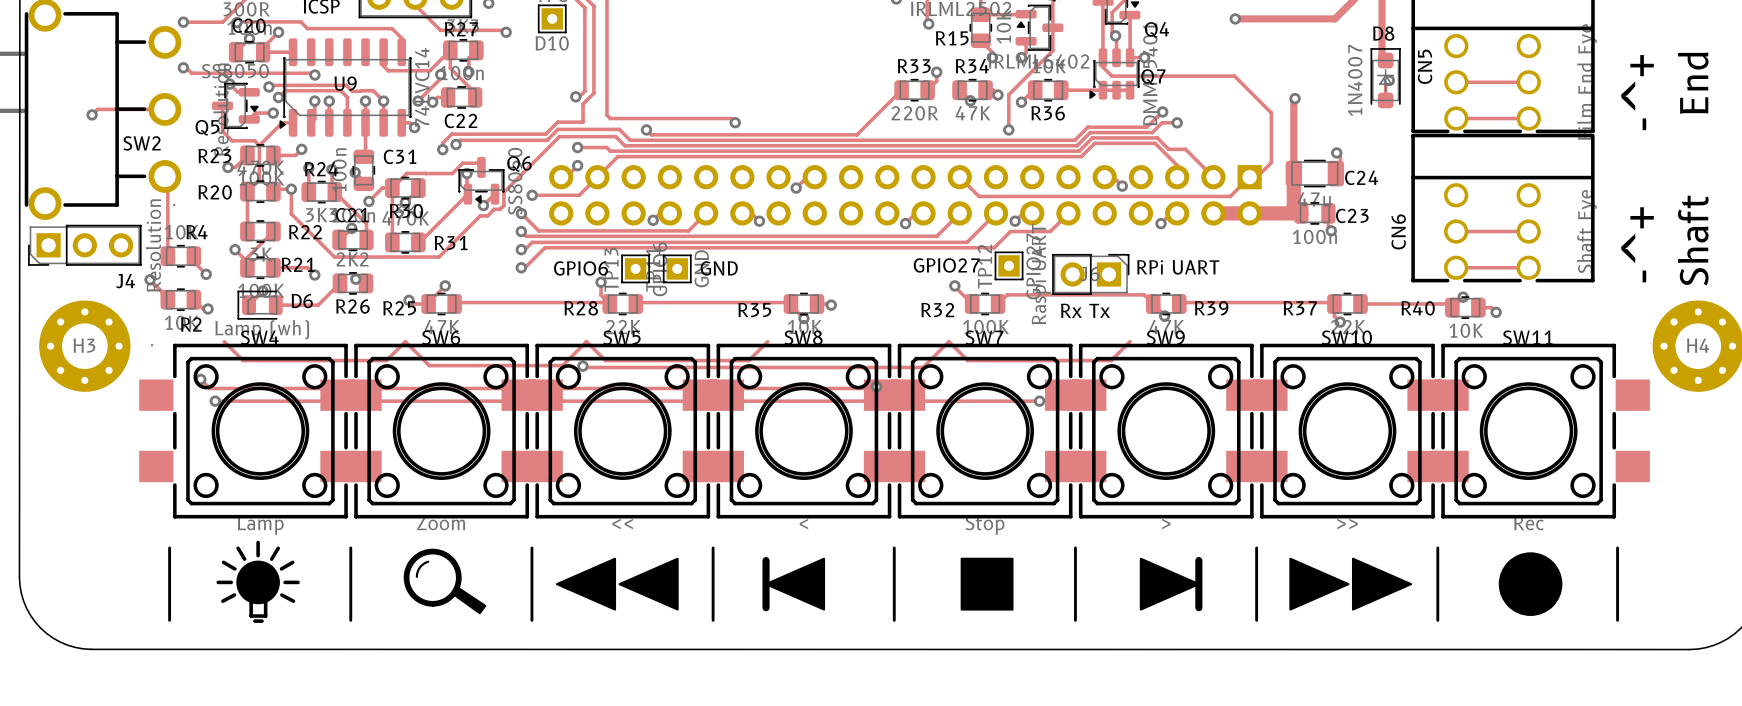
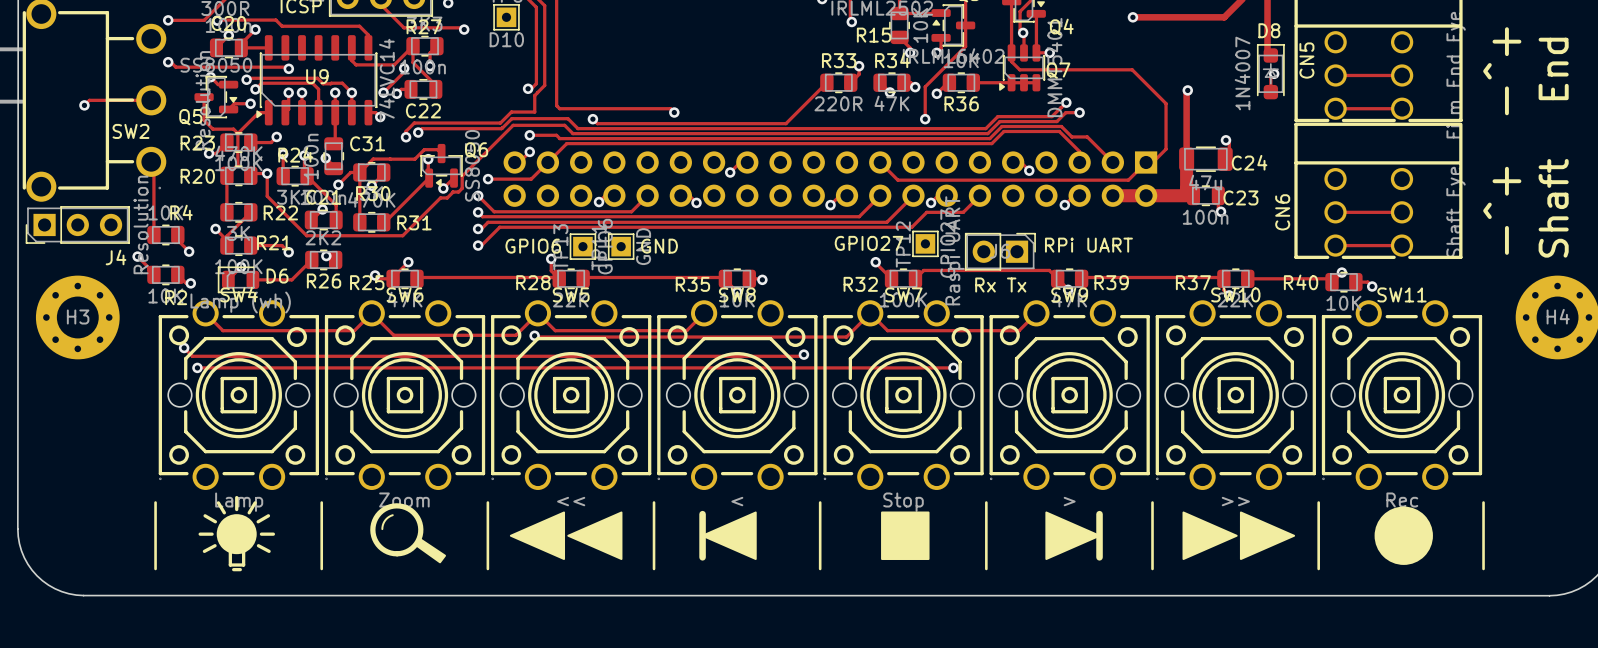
SW4 footprint: [139, 343, 382, 519] -> [158, 300, 320, 490]
SW6 footprint: [320, 343, 563, 519] -> [324, 300, 486, 490]
SW5 footprint: [501, 343, 745, 519] -> [491, 300, 652, 490]
SW8 footprint: [682, 343, 926, 519] -> [657, 300, 818, 490]
SW7 footprint: [863, 343, 1107, 519] -> [823, 300, 984, 490]
SW9 footprint: [1045, 343, 1288, 519] -> [989, 300, 1150, 490]
SW10 footprint: [1226, 343, 1469, 519] -> [1155, 300, 1317, 490]
SW11 footprint: [1407, 343, 1650, 519] -> [1321, 300, 1483, 490]

